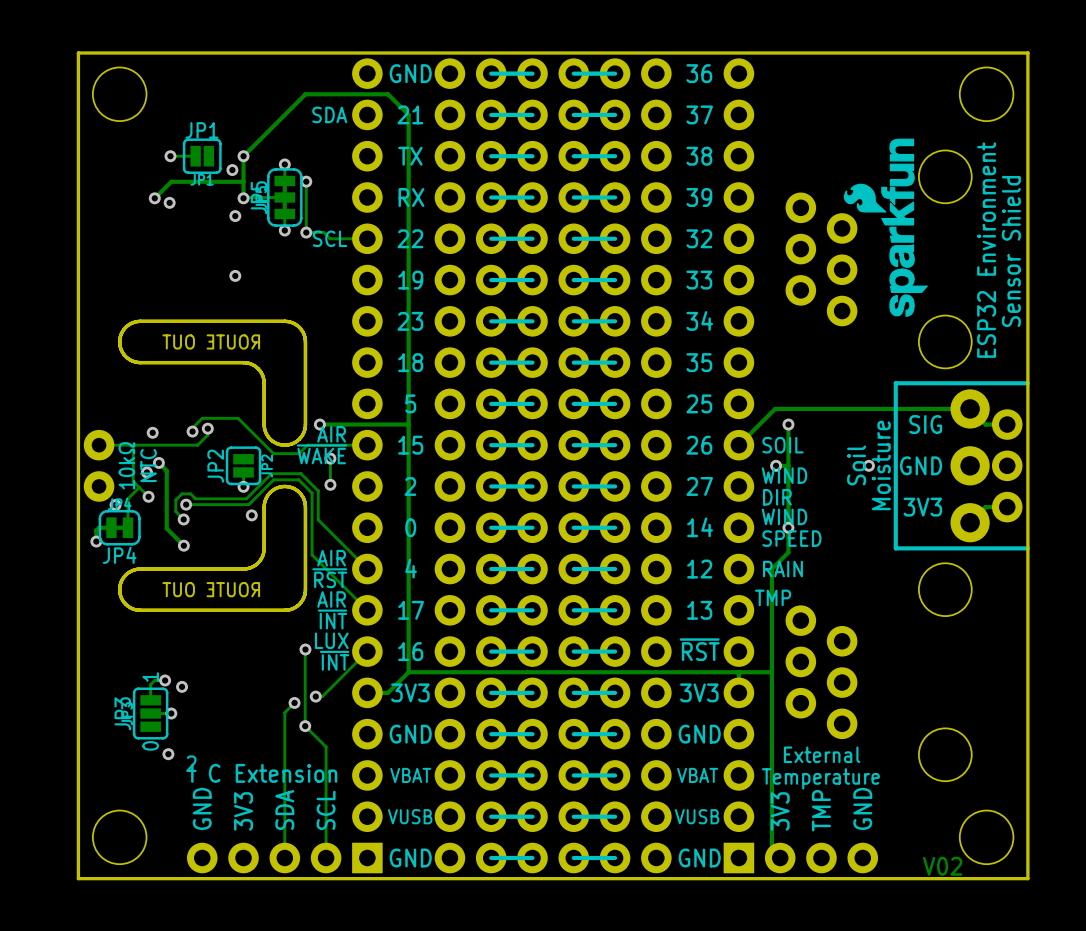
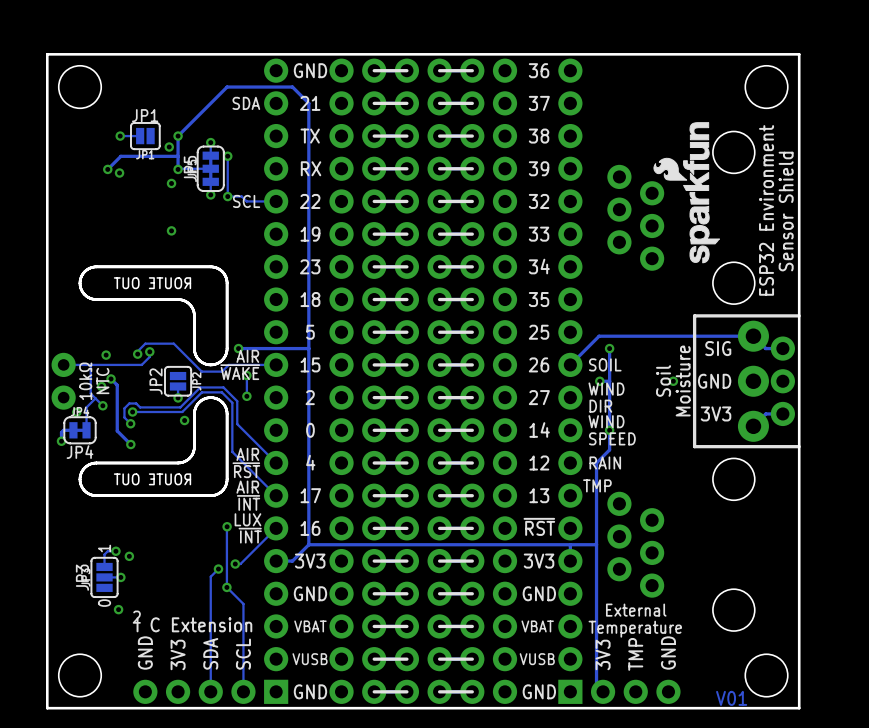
text: V02 (942, 866) -> V01 (731, 698)

